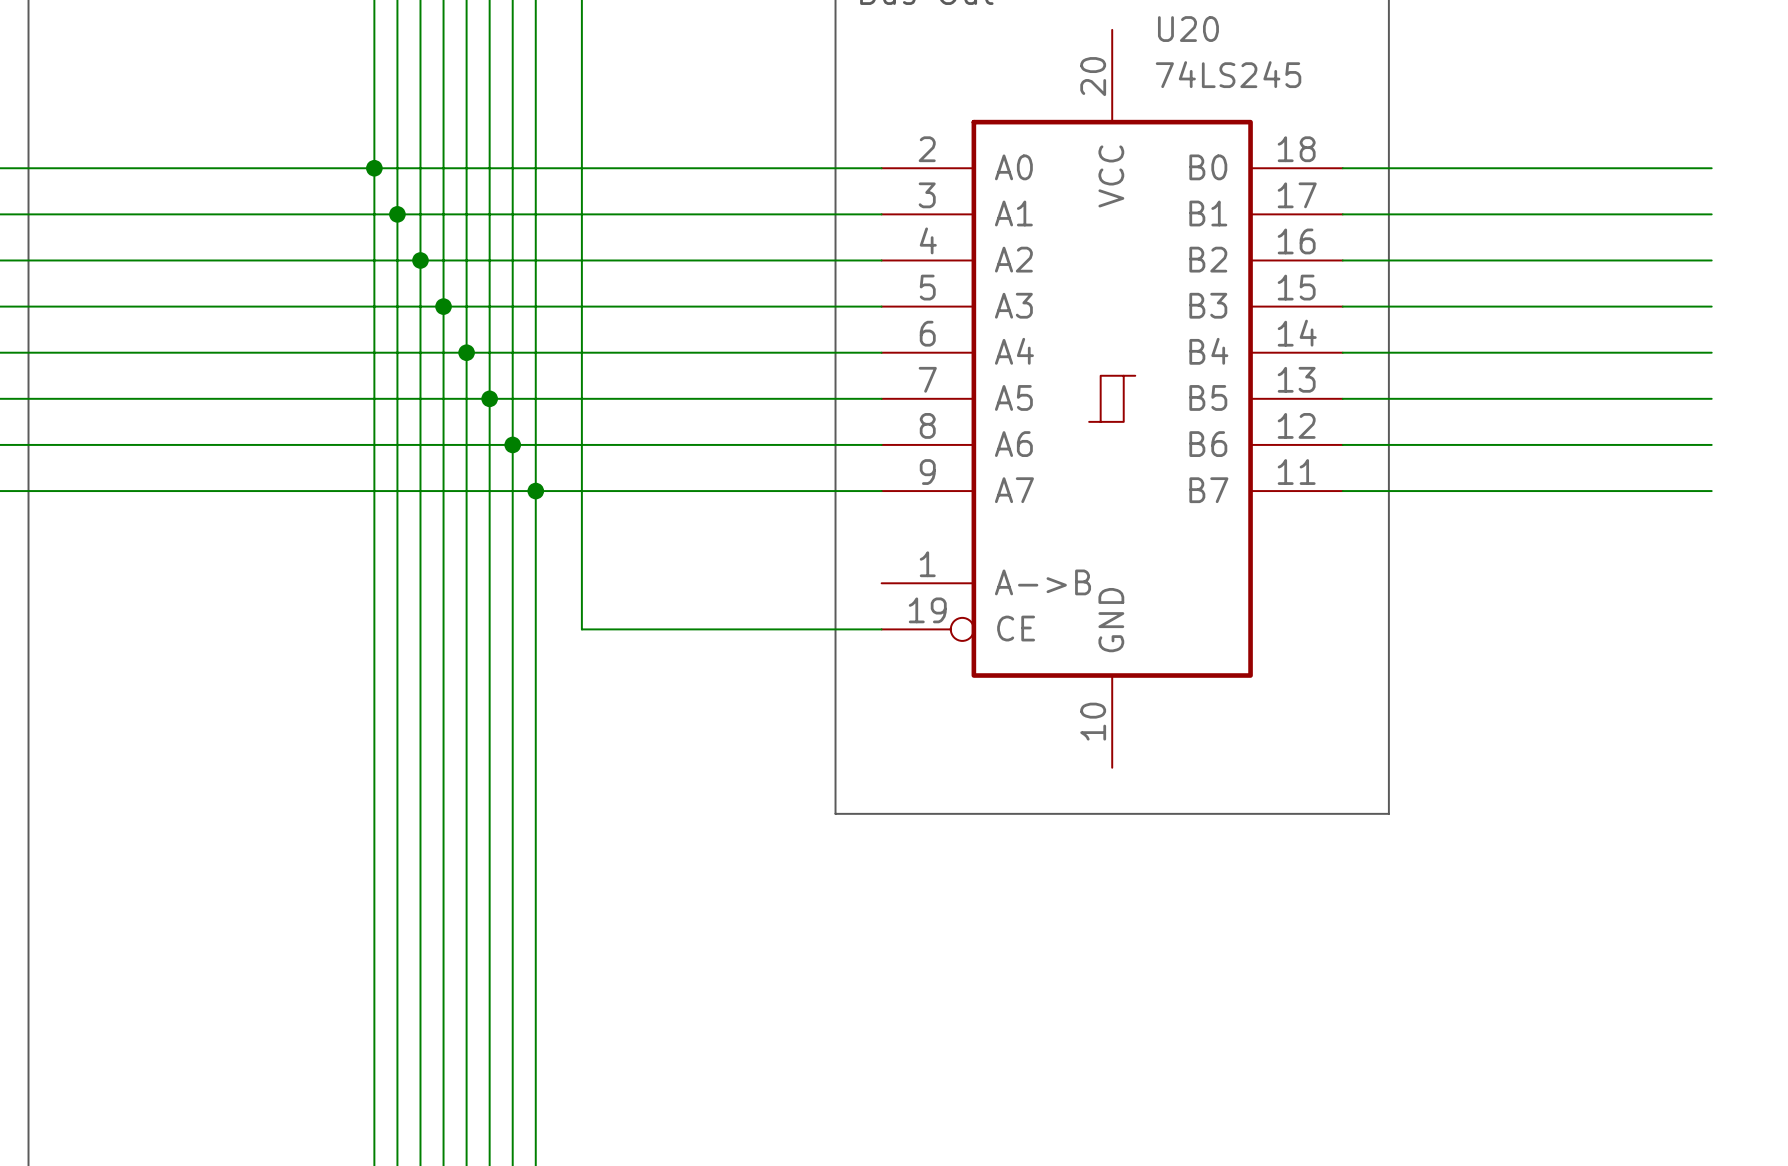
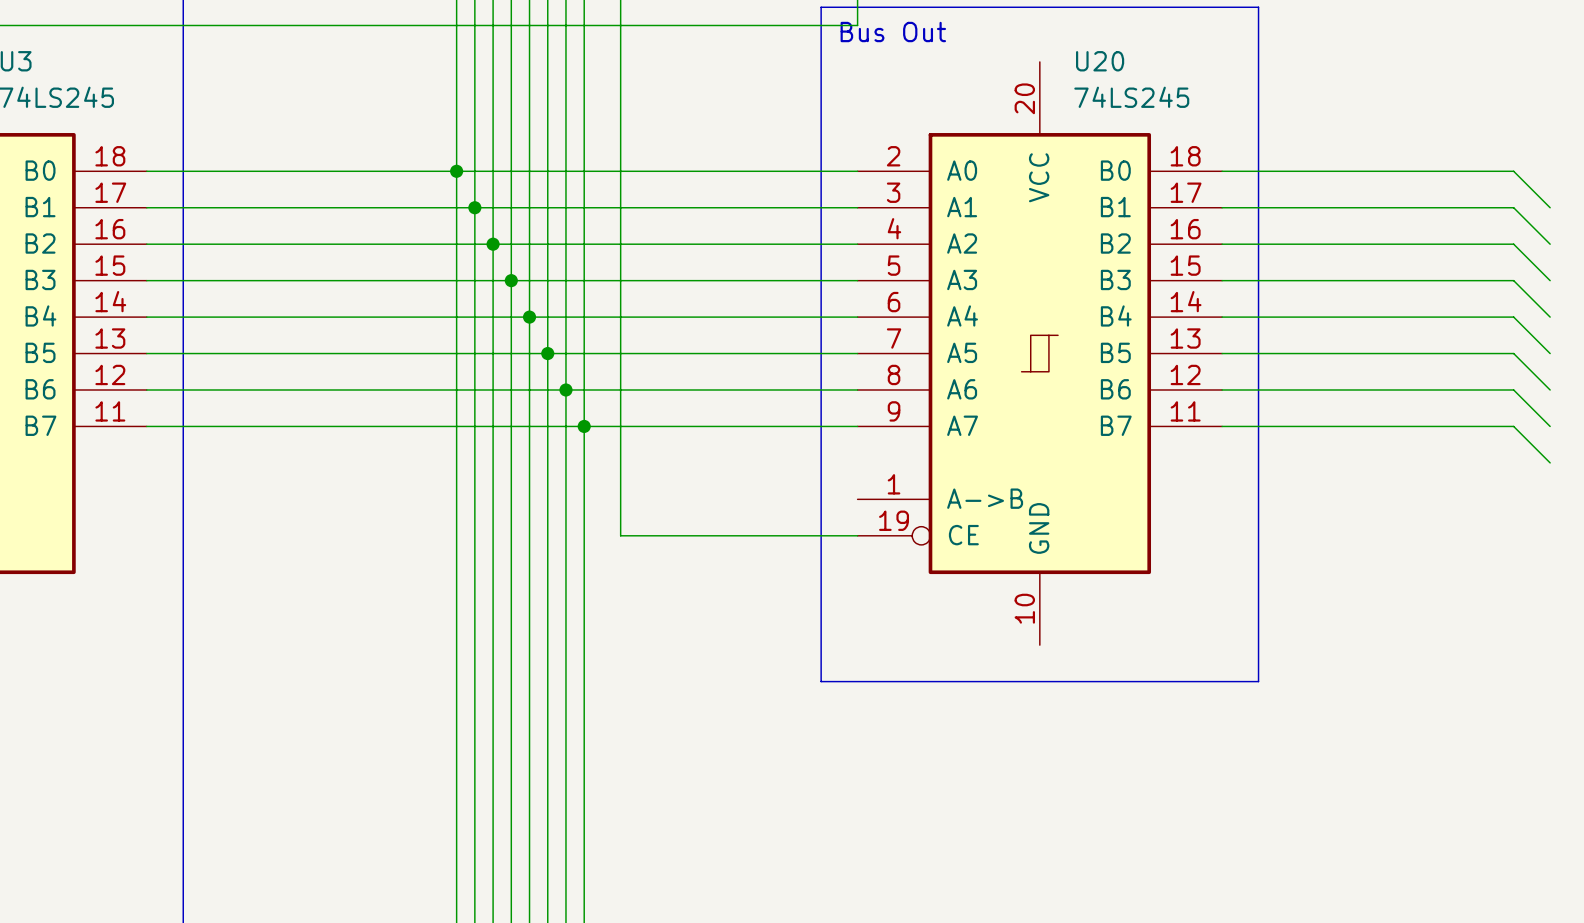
wire: none -> (1513, 171) (1550, 207)
wire: none -> (1513, 207) (1550, 244)
wire: none -> (1513, 244) (1550, 280)
wire: none -> (1513, 280) (1550, 317)
wire: none -> (1513, 317) (1550, 353)
wire: none -> (1513, 353) (1550, 389)
wire: none -> (1513, 389) (1550, 426)
wire: none -> (1513, 426) (1550, 462)

